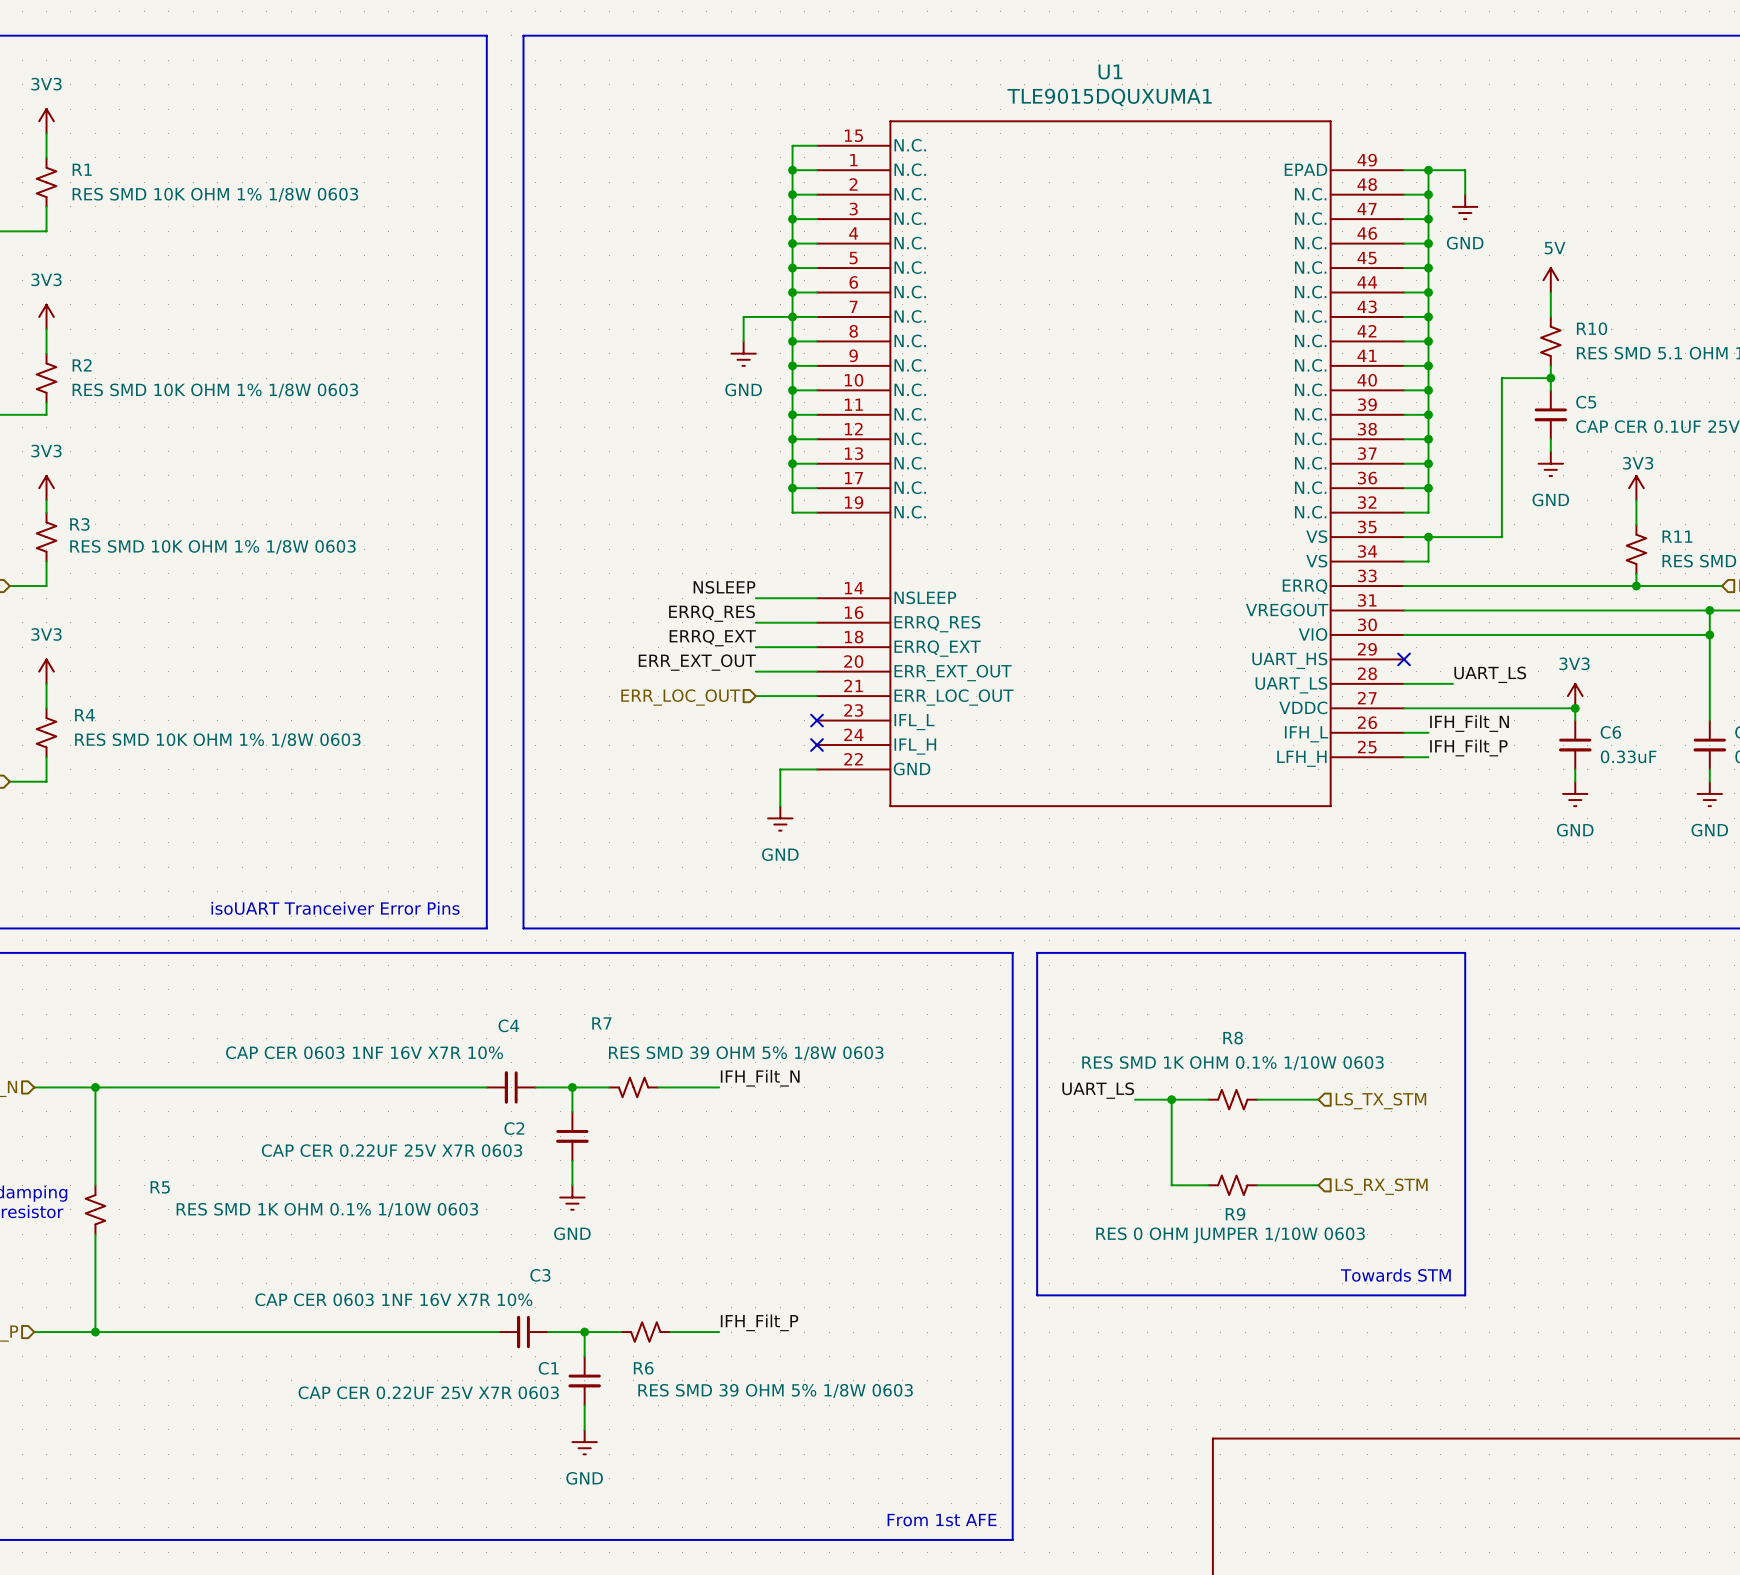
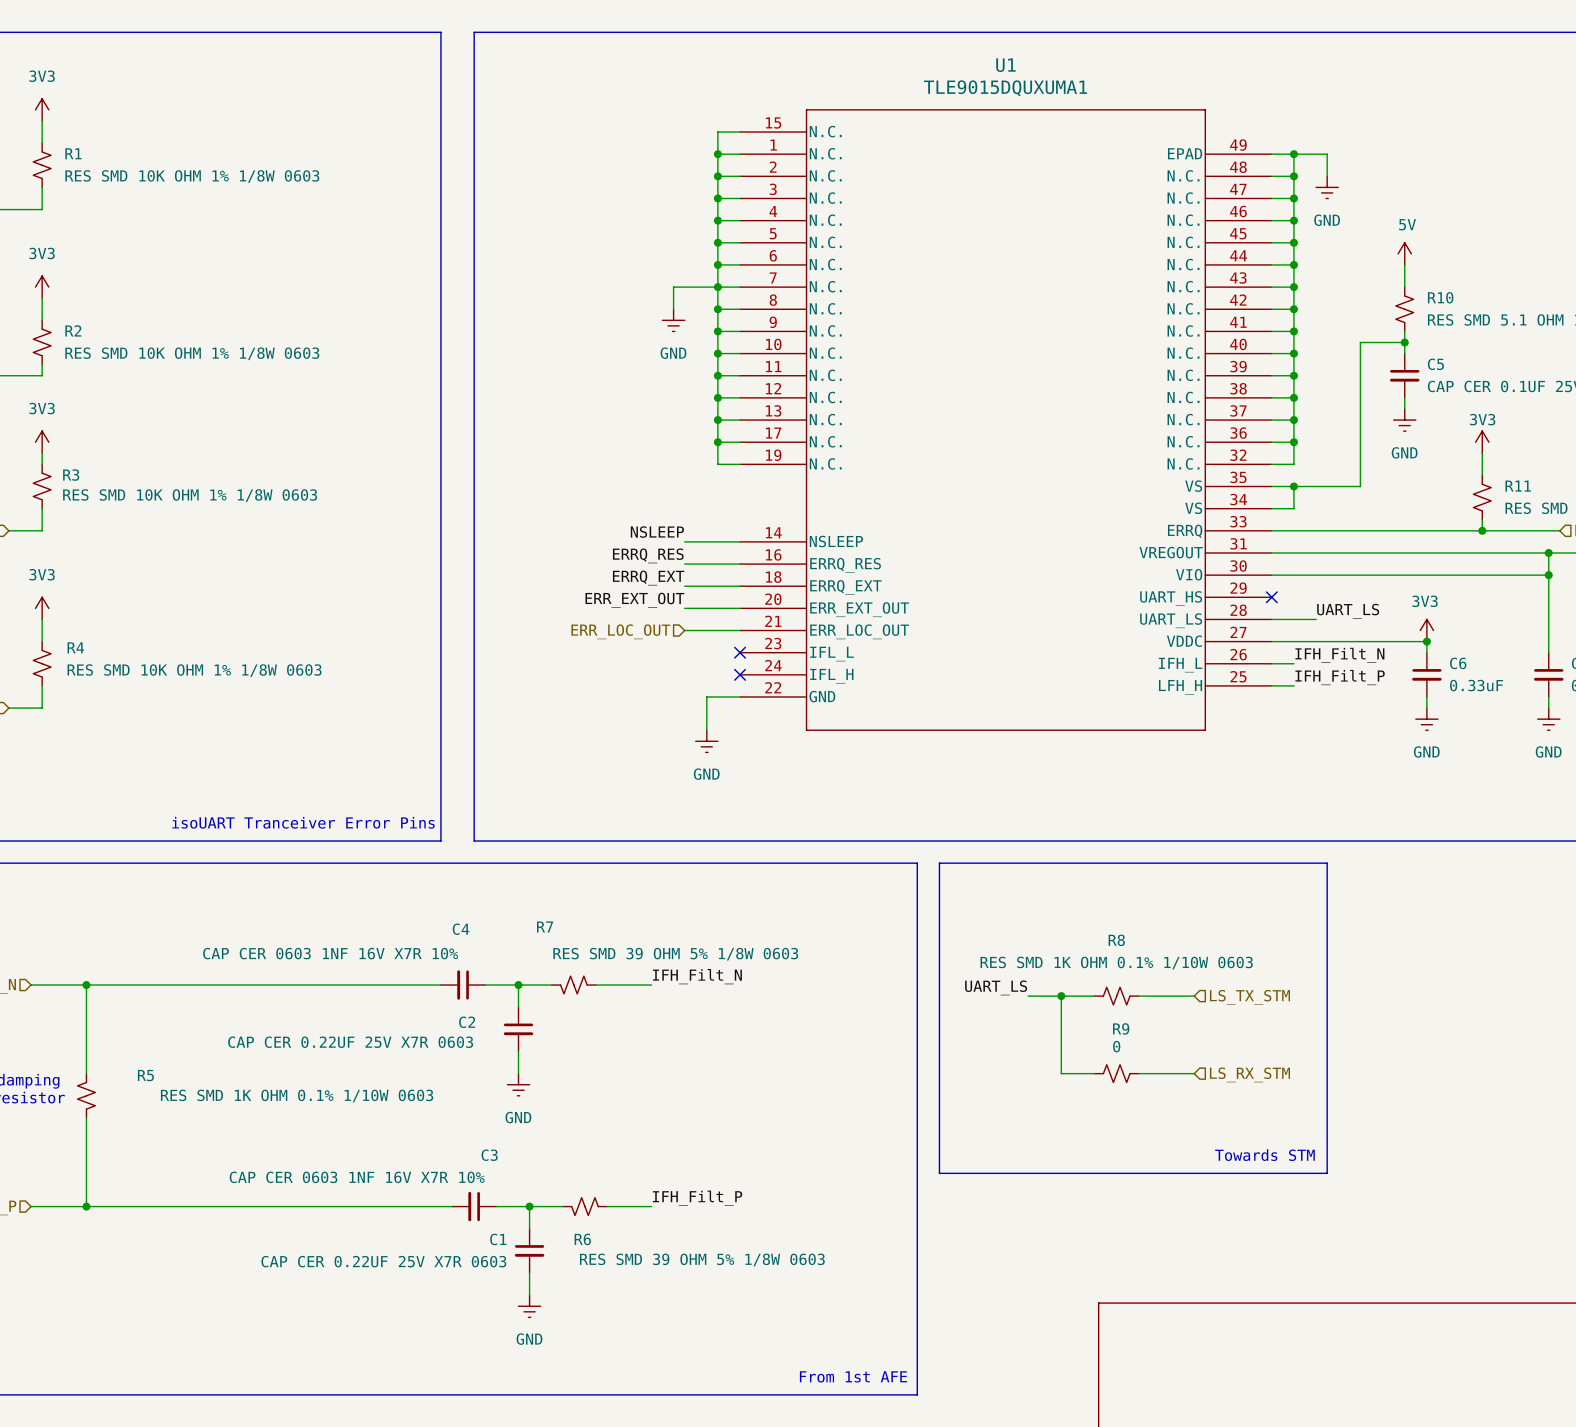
R9 name position: R9 (1235, 1214) -> R9 (1121, 1028)
R9 value: RES 0 OHM JUMPER 1/10W 0603 (1230, 1235) -> 0 (1116, 1046)

